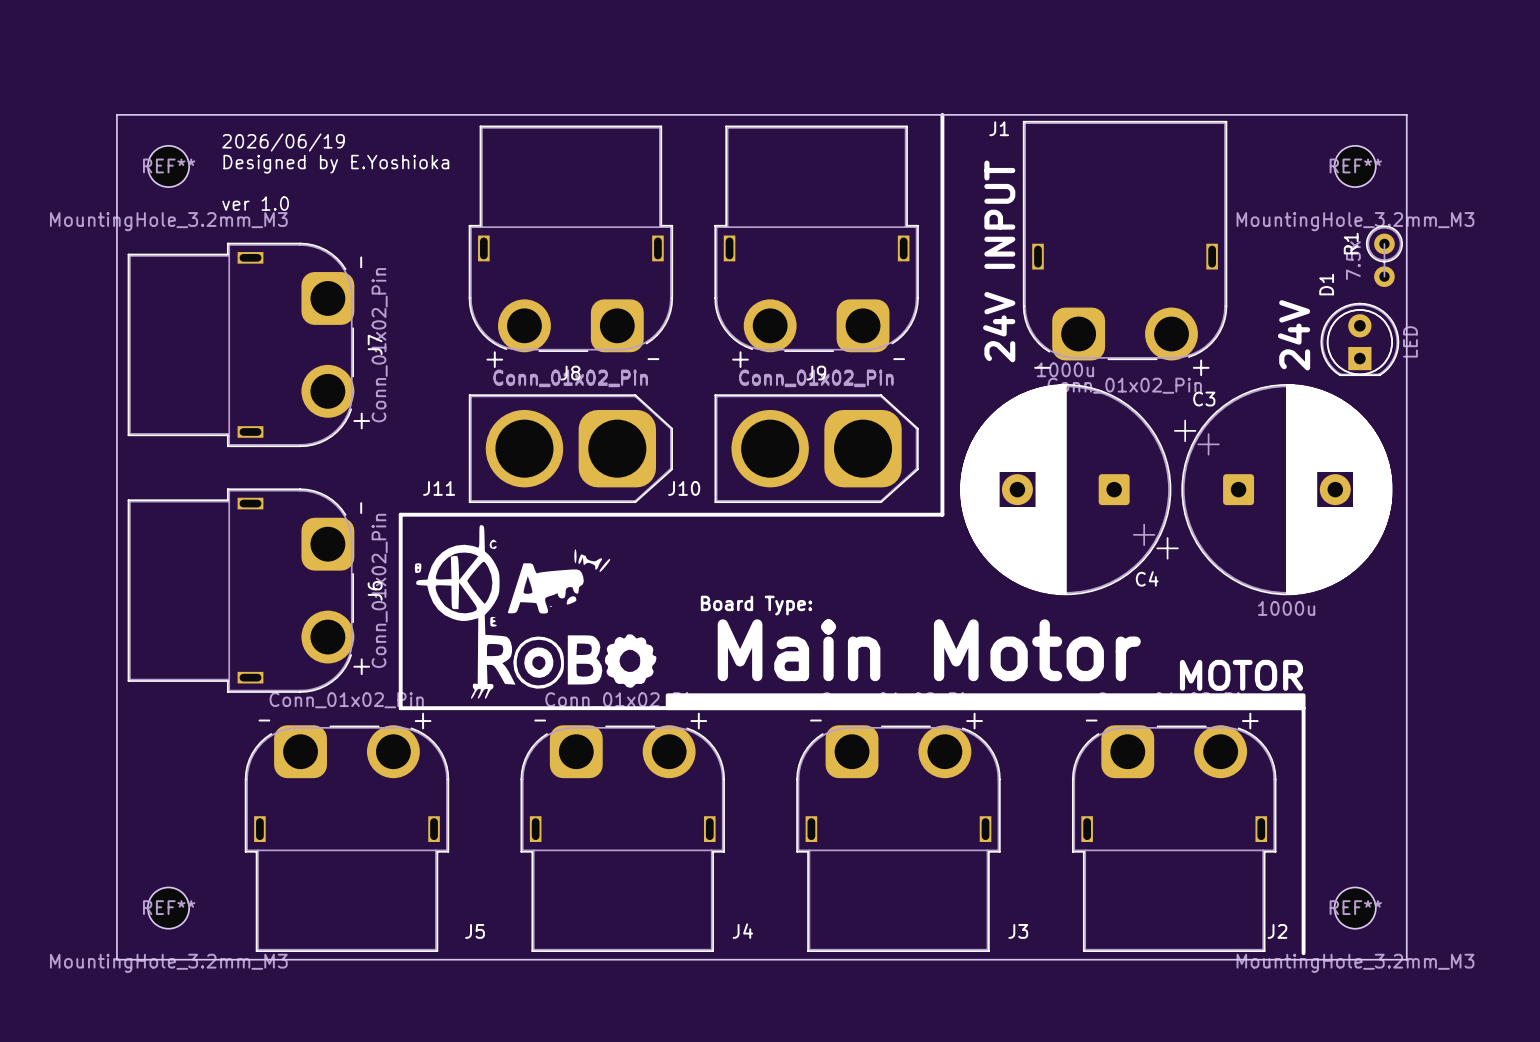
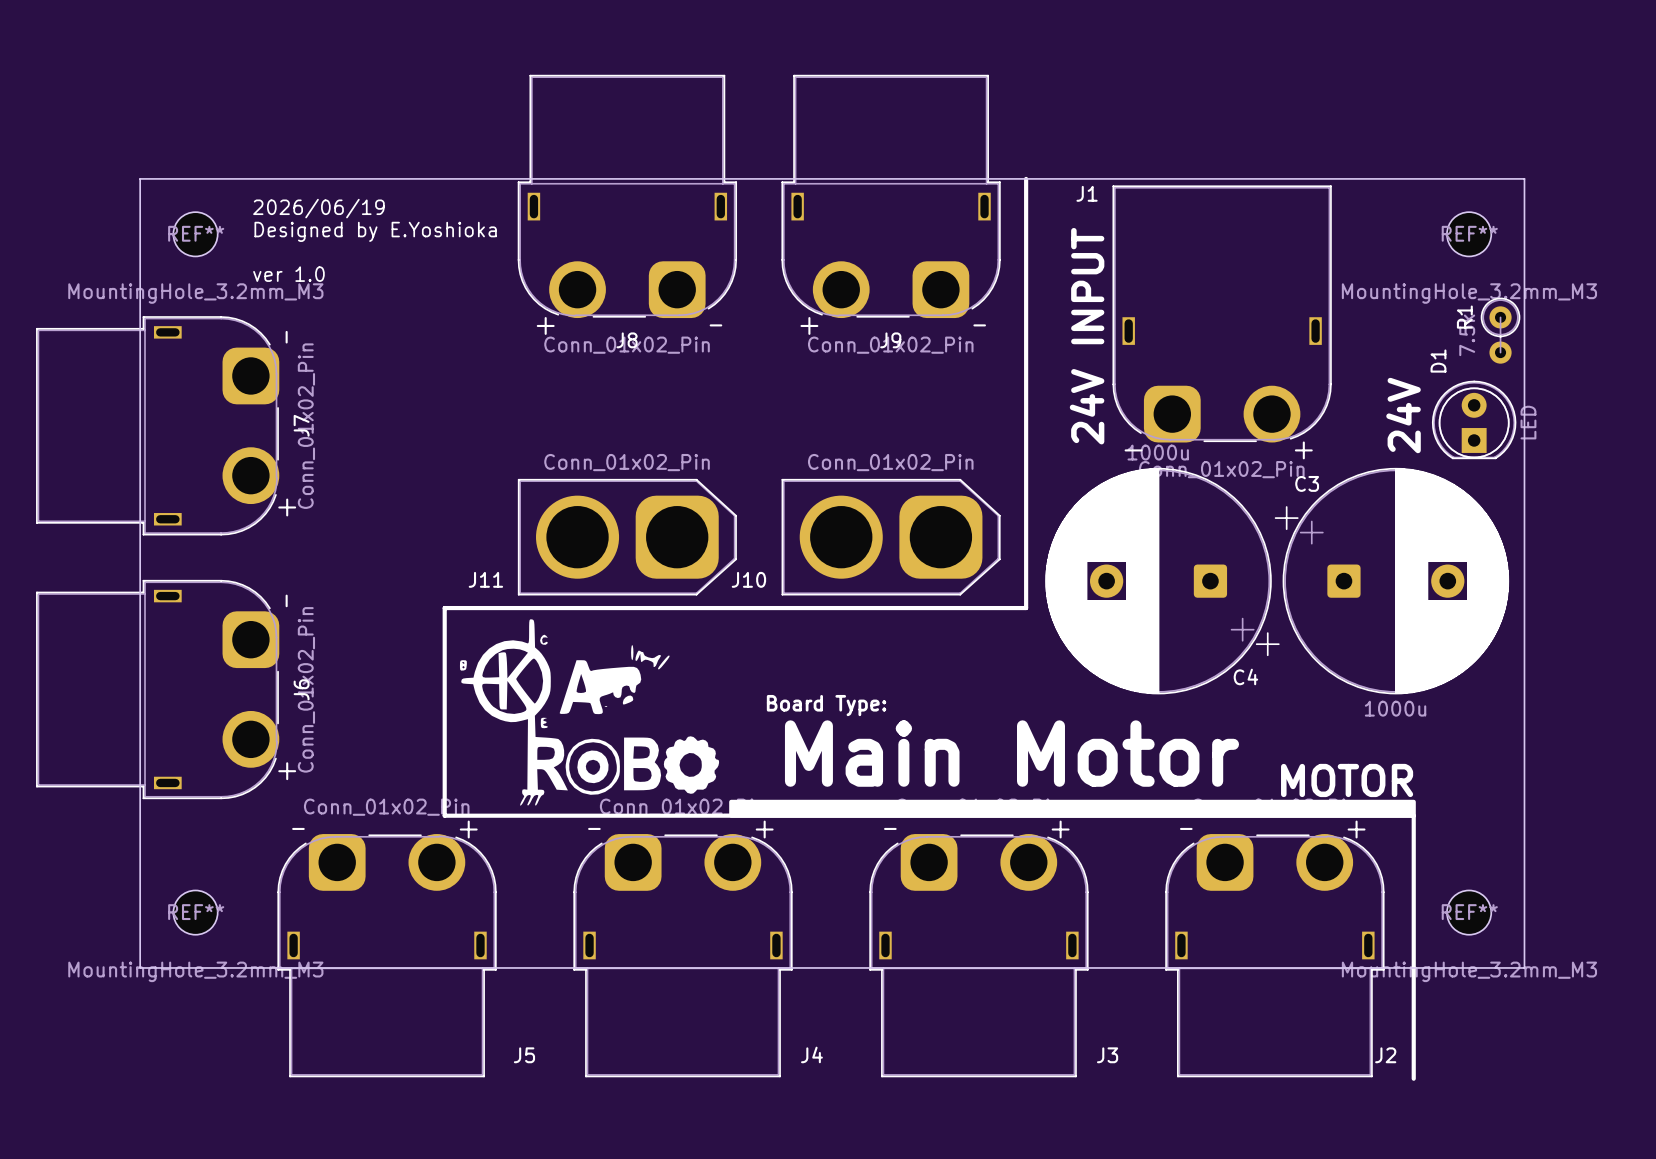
J8 position: (570, 238) -> (627, 196)
J9 position: (816, 238) -> (891, 196)
J7 position: (241, 344) -> (157, 425)
J6 position: (241, 590) -> (157, 689)
board edge: (116, 850) (116, 959) (1406, 959) (1406, 850) -> (140, 967) (1524, 967)
REF** position: (168, 908) -> (195, 912)
REF** position: (1355, 908) -> (1469, 912)

